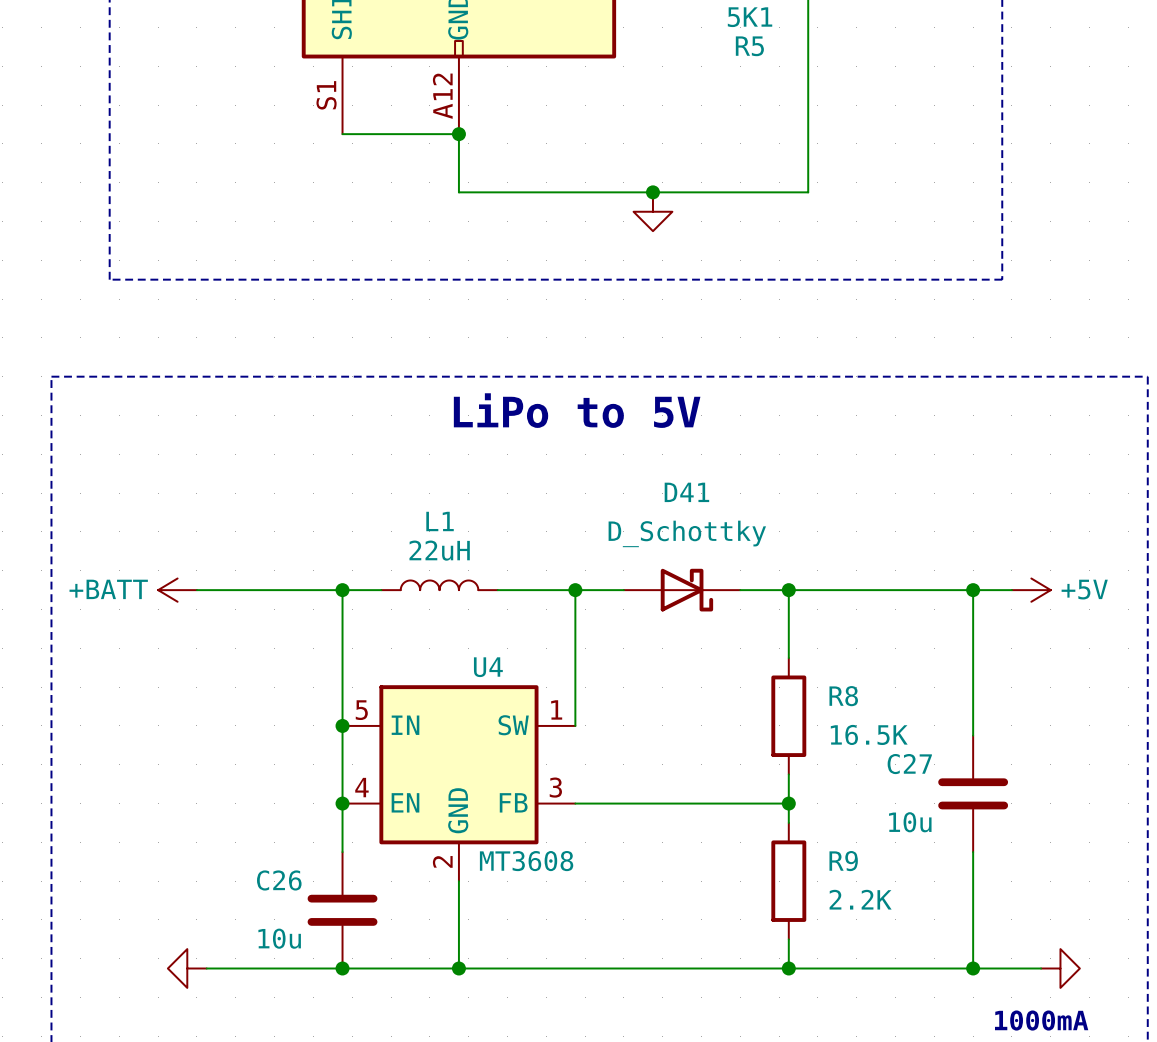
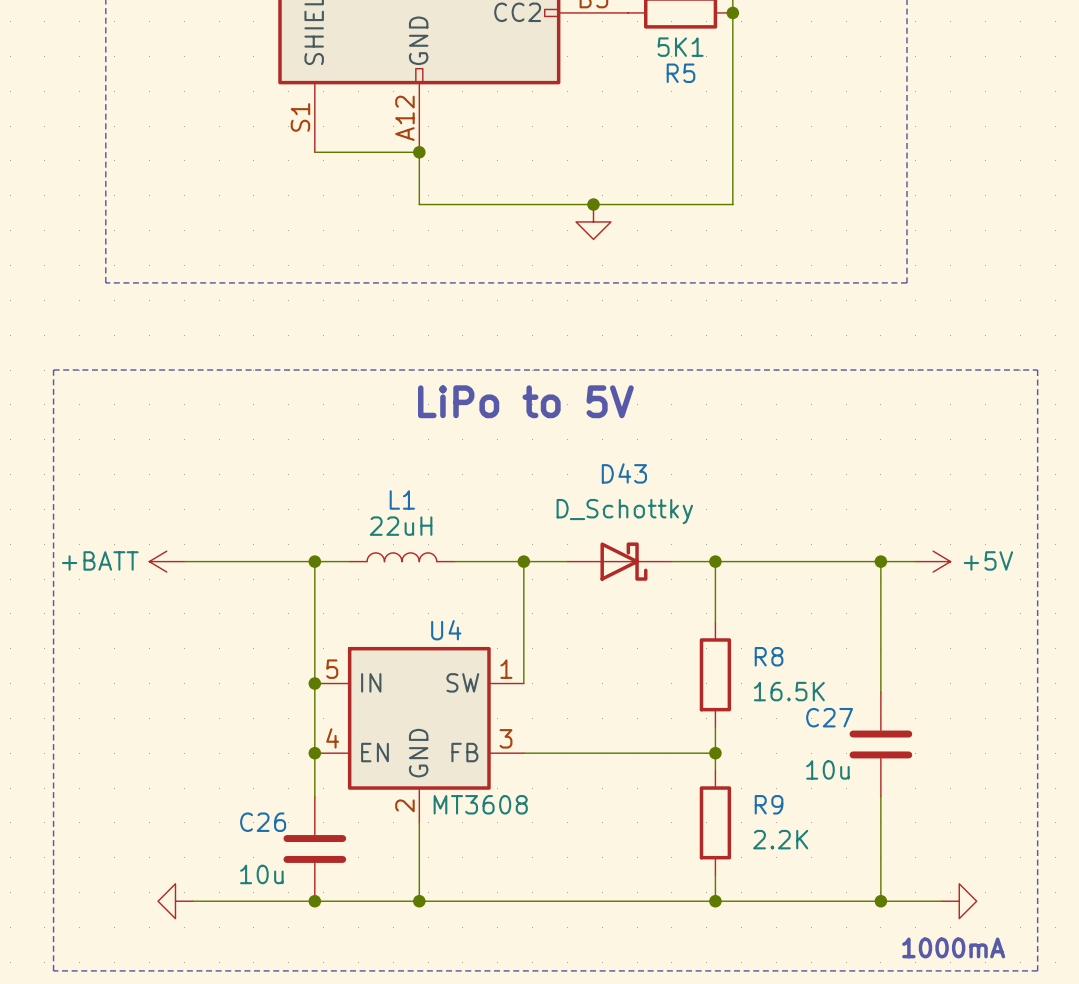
D41 name: D41 (686, 492) -> D43 (624, 473)

